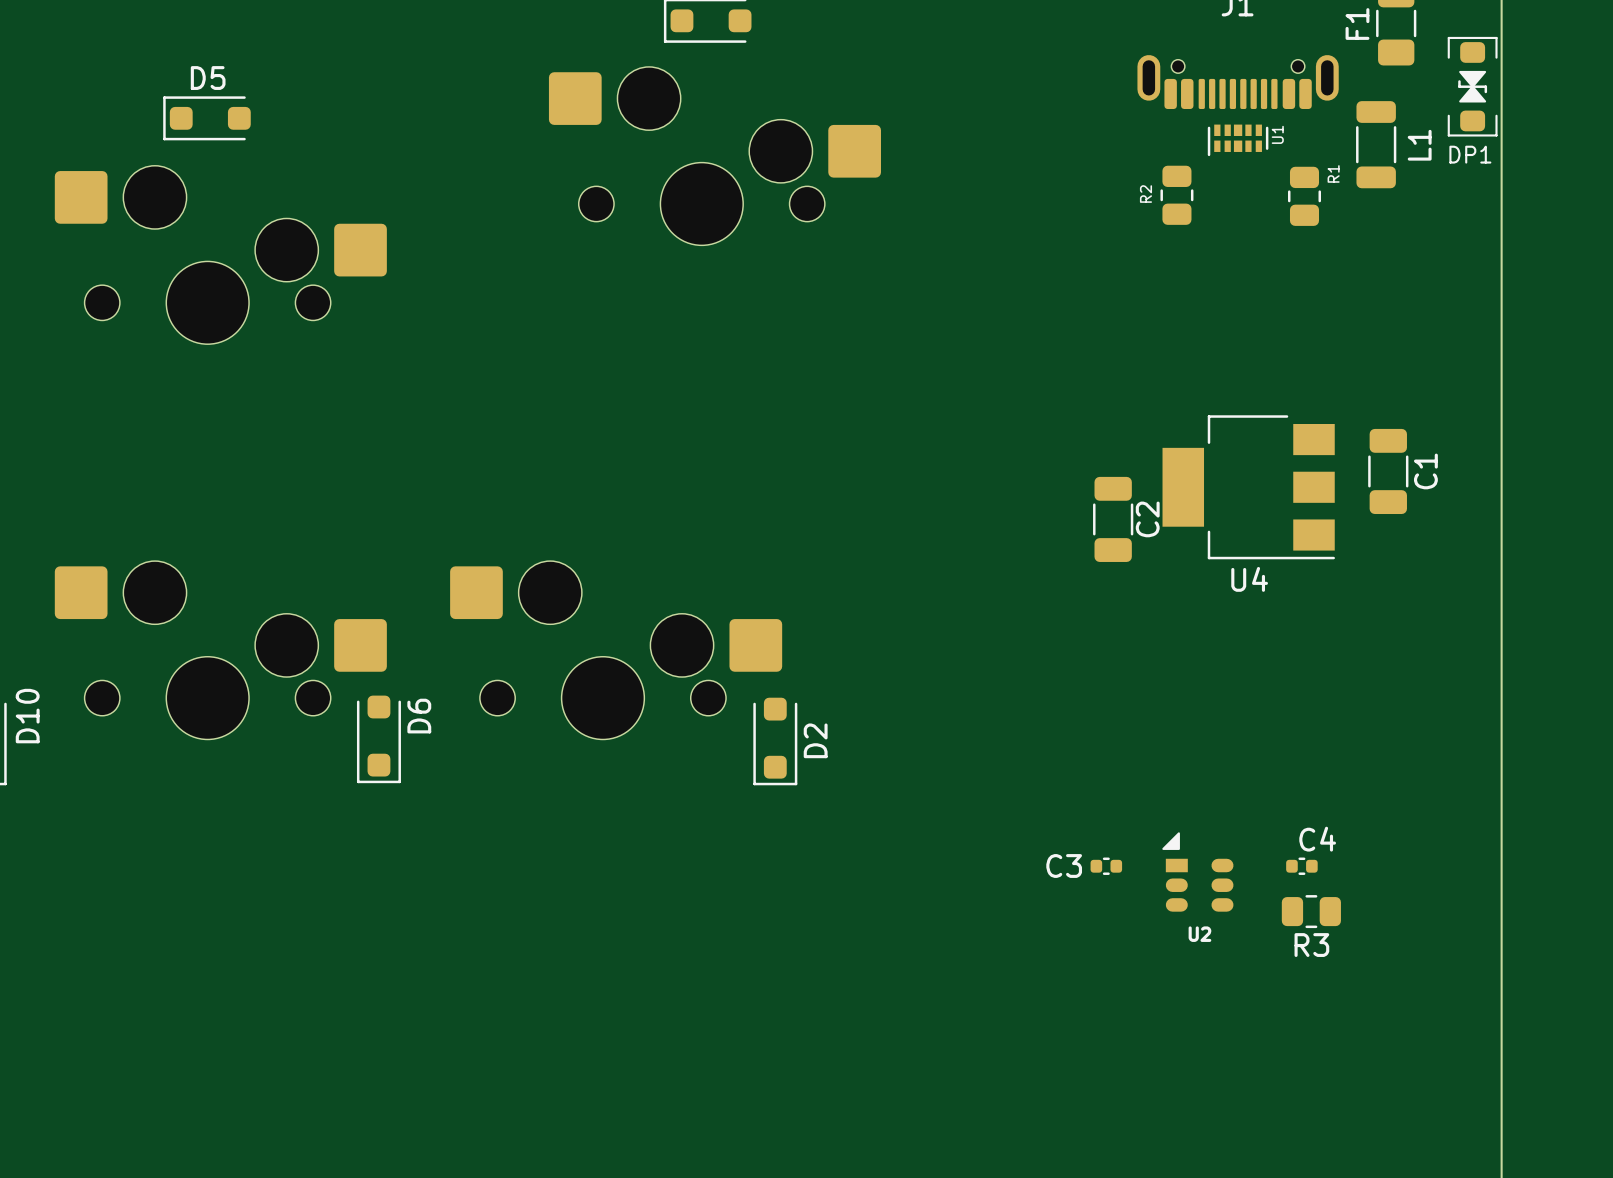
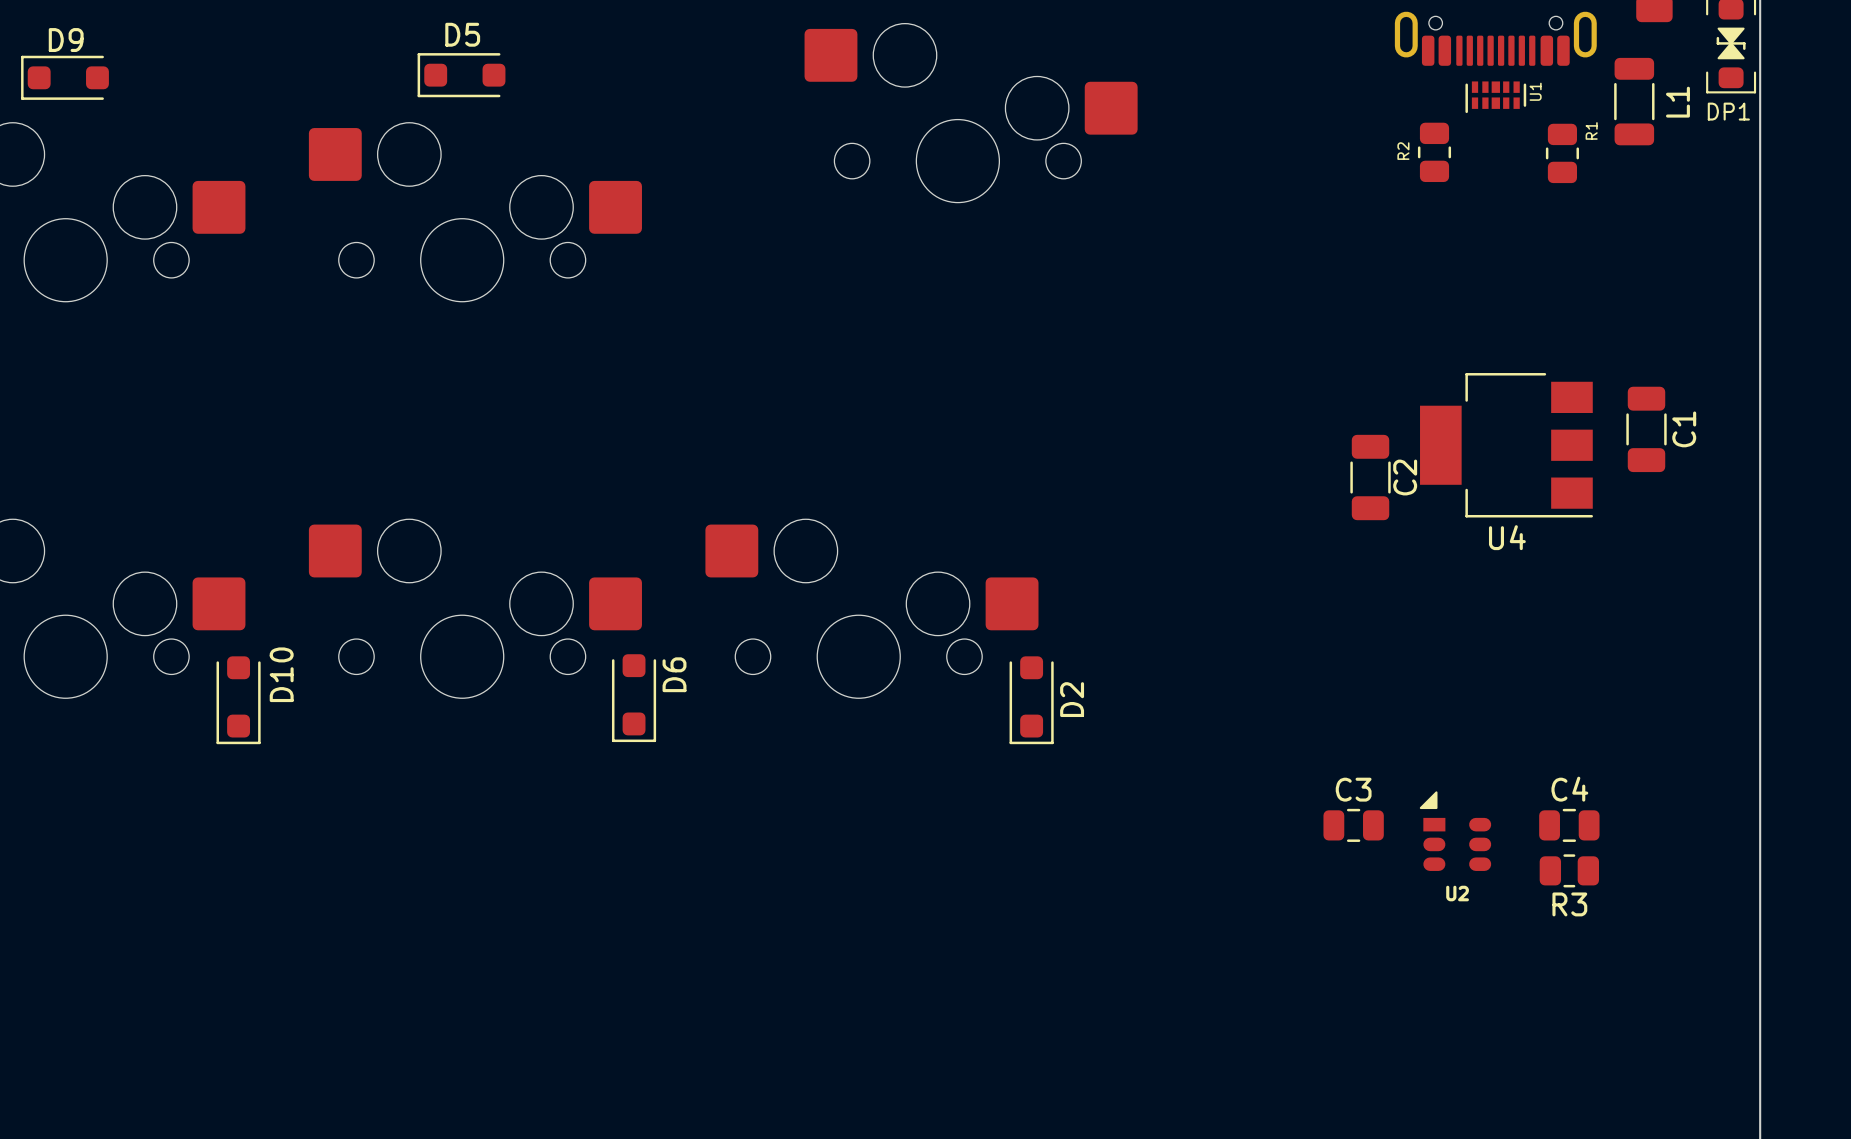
C3 footprint: [1090, 857, 1123, 875] -> [1323, 808, 1384, 842]
C4 footprint: [1286, 857, 1318, 875] -> [1539, 808, 1600, 842]
C3 name position: C3 (1064, 866) -> C3 (1353, 789)

